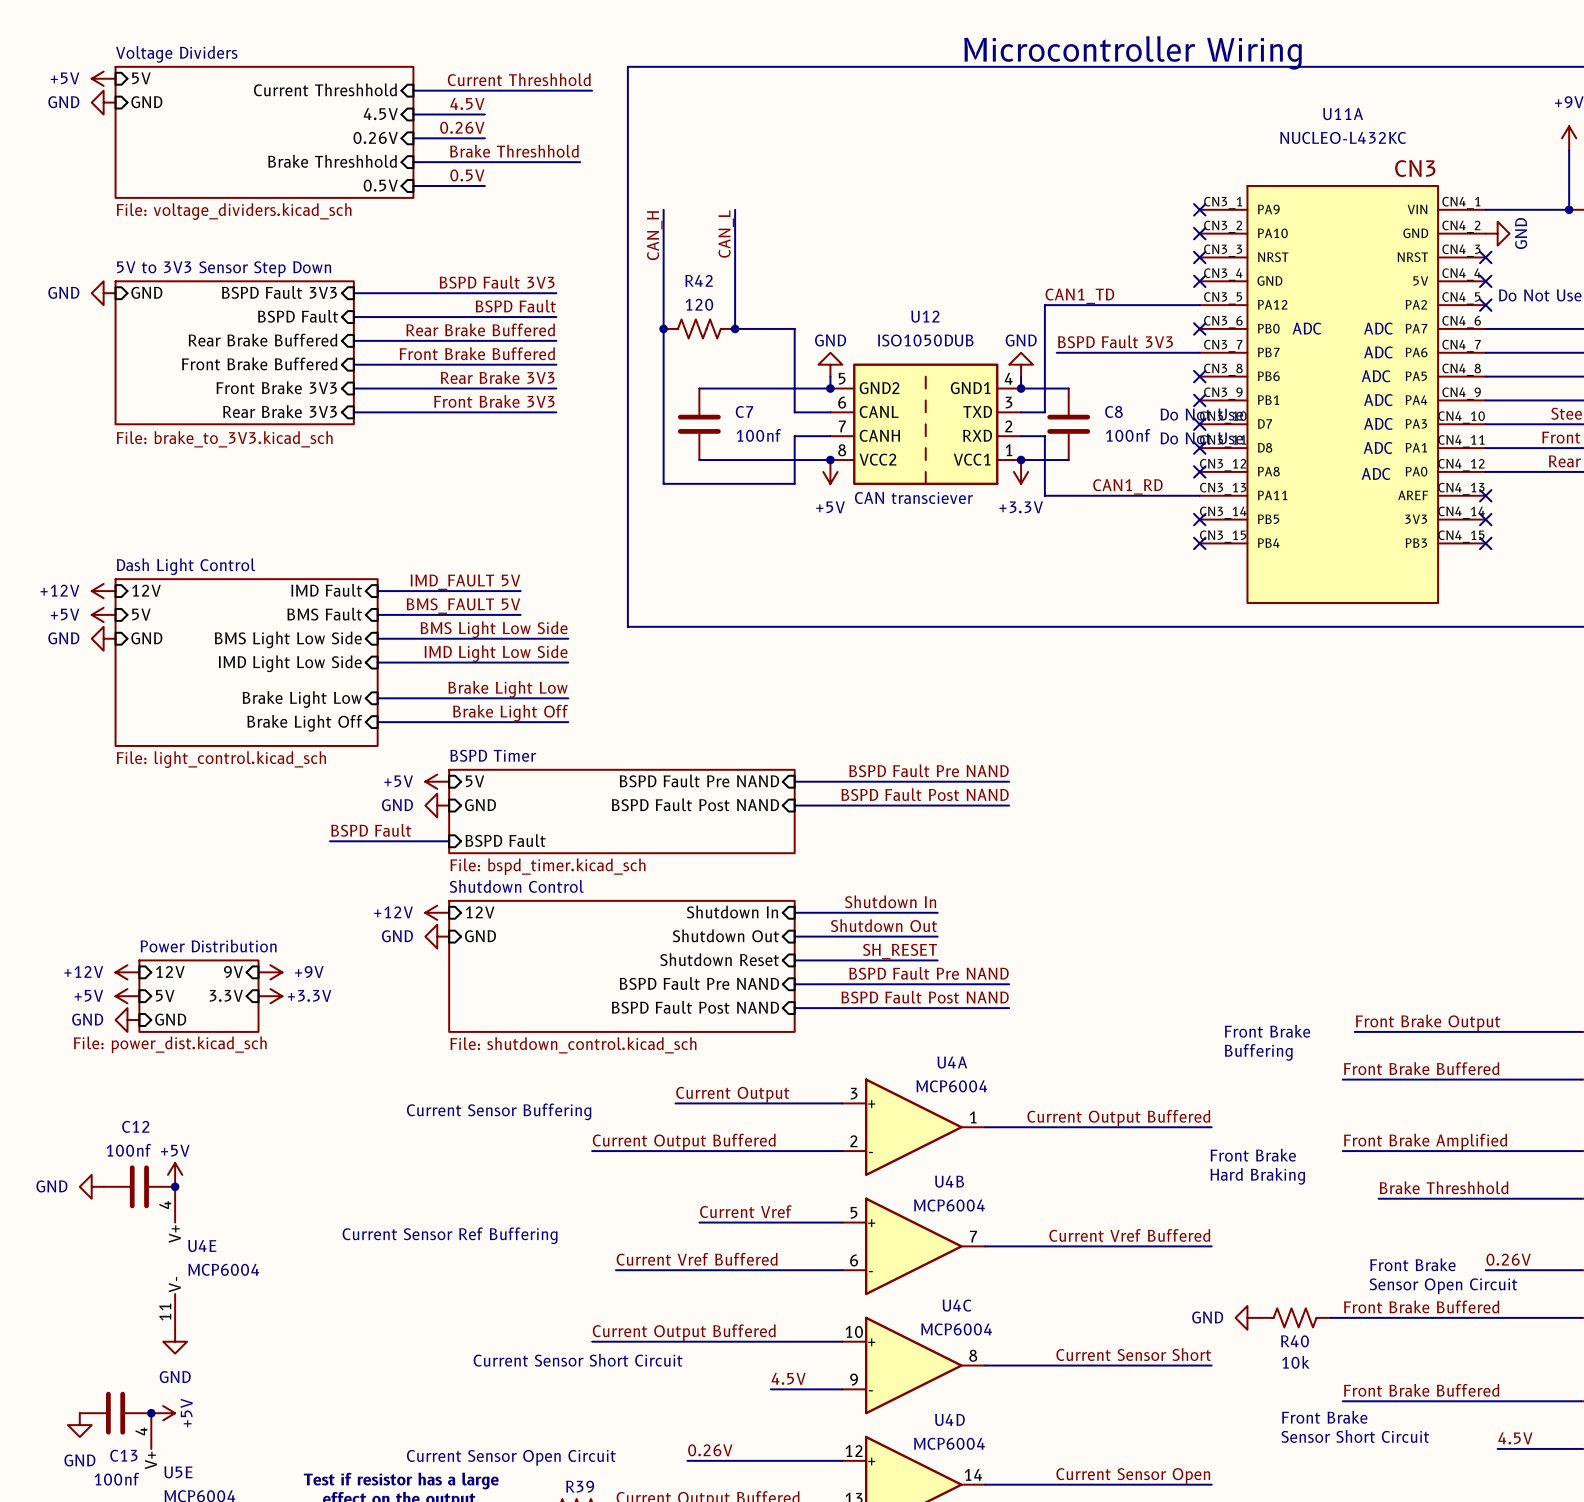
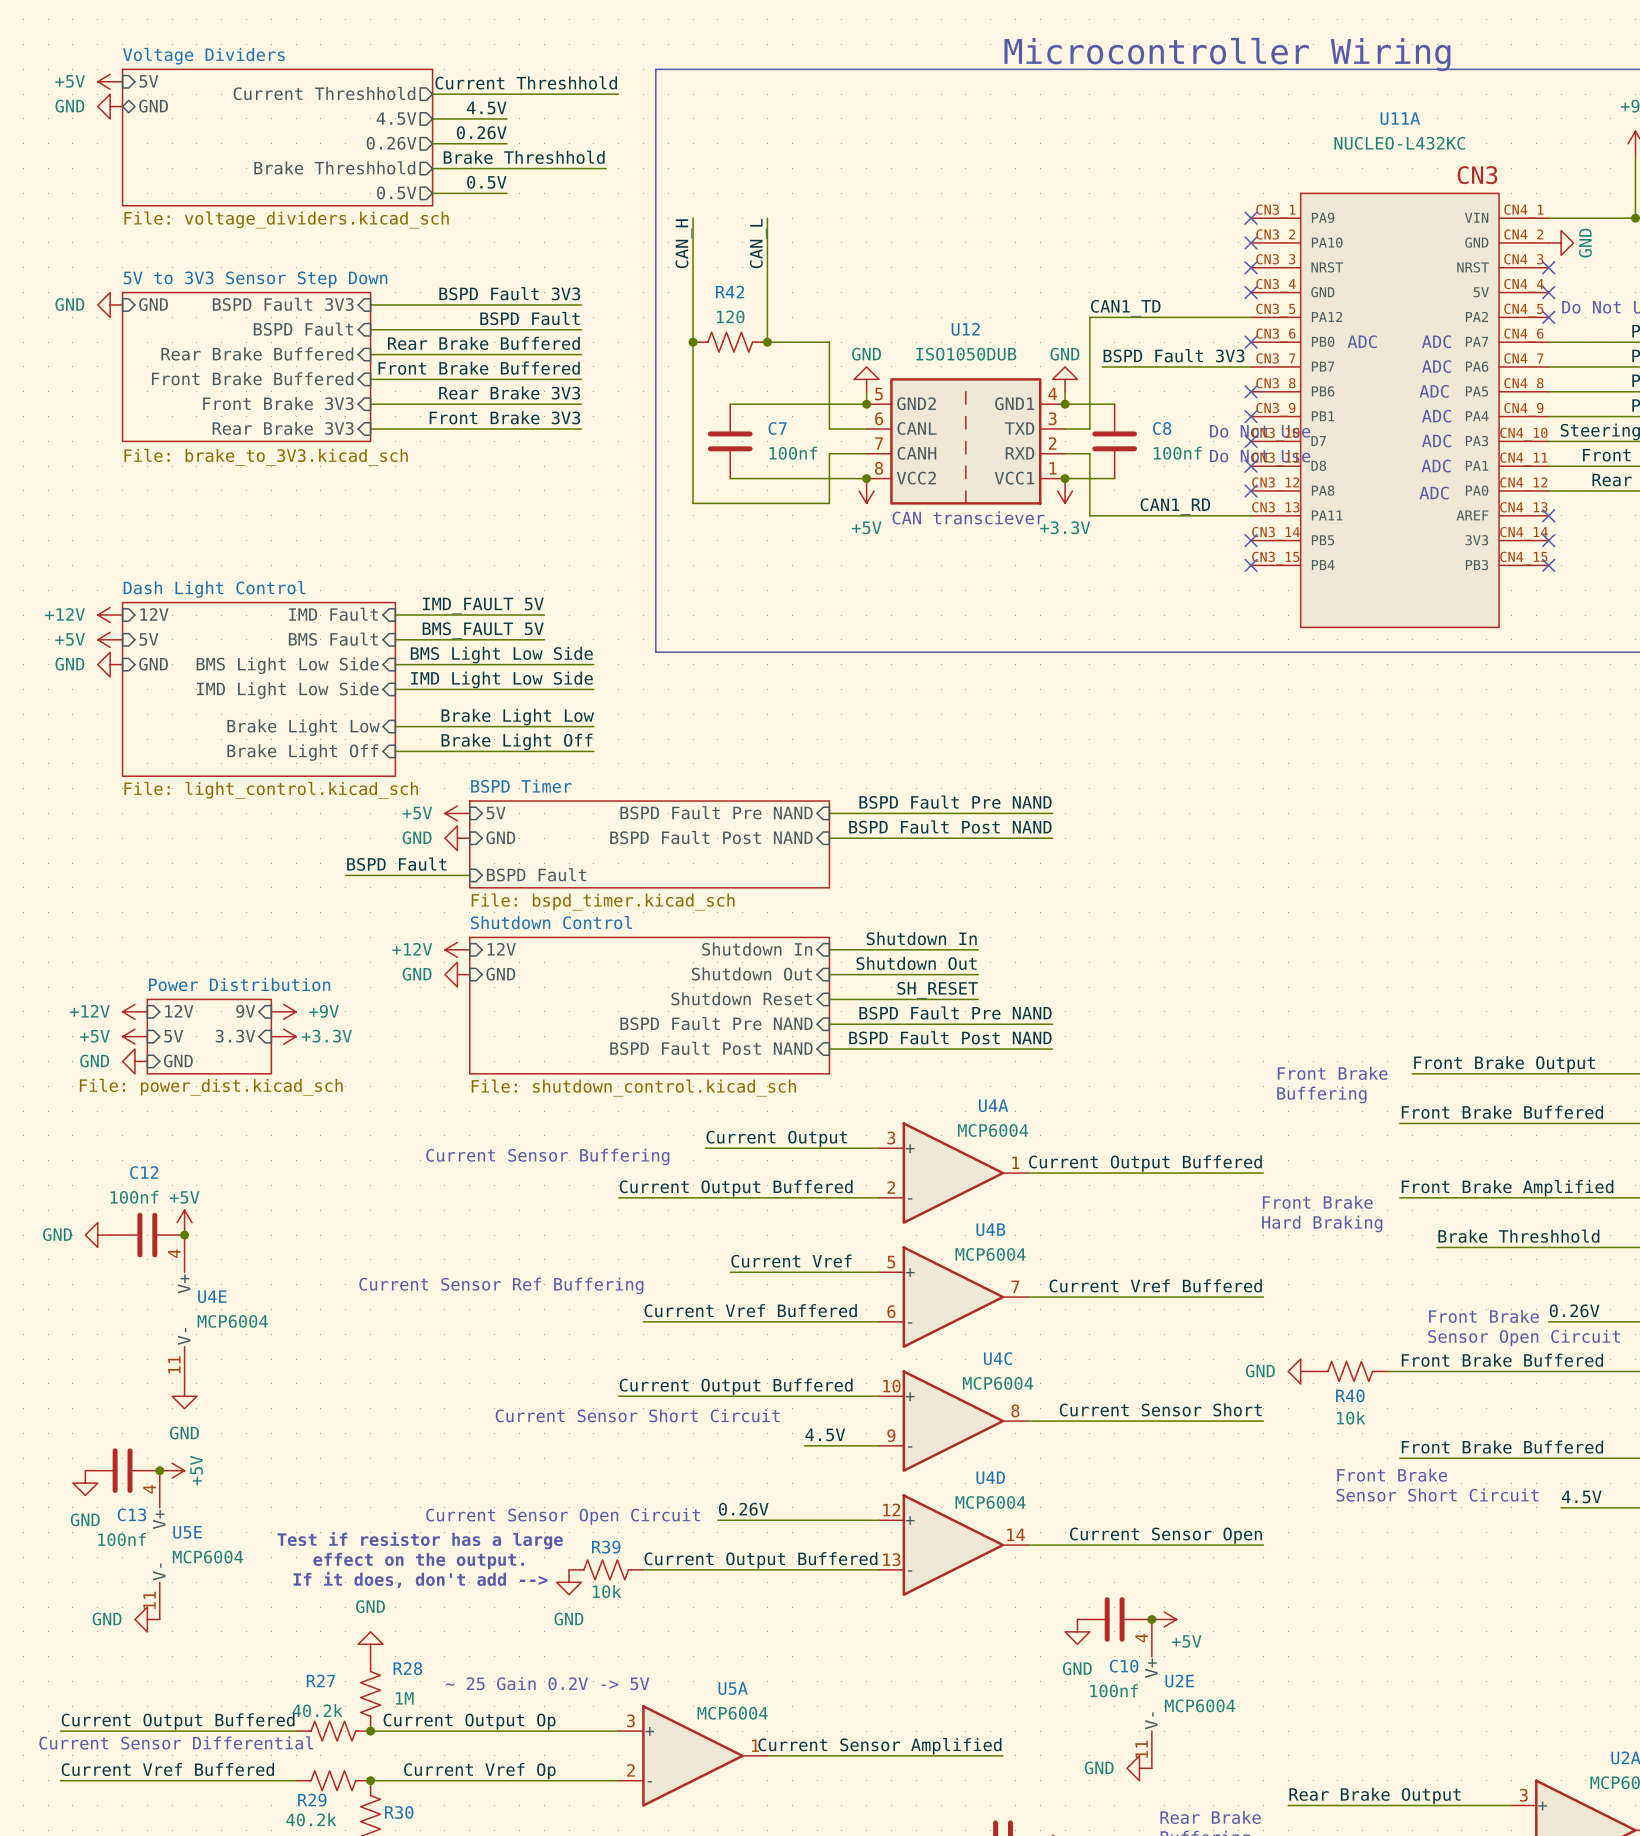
sheet pin shape: input (325, 89) -> output (324, 93)
sheet pin shape: input (146, 102) -> bidirectional (153, 106)
sheet pin shape: input (380, 114) -> output (396, 118)
sheet pin shape: input (375, 137) -> output (391, 143)
sheet pin shape: input (332, 161) -> output (334, 167)
sheet pin shape: input (380, 185) -> output (396, 192)

